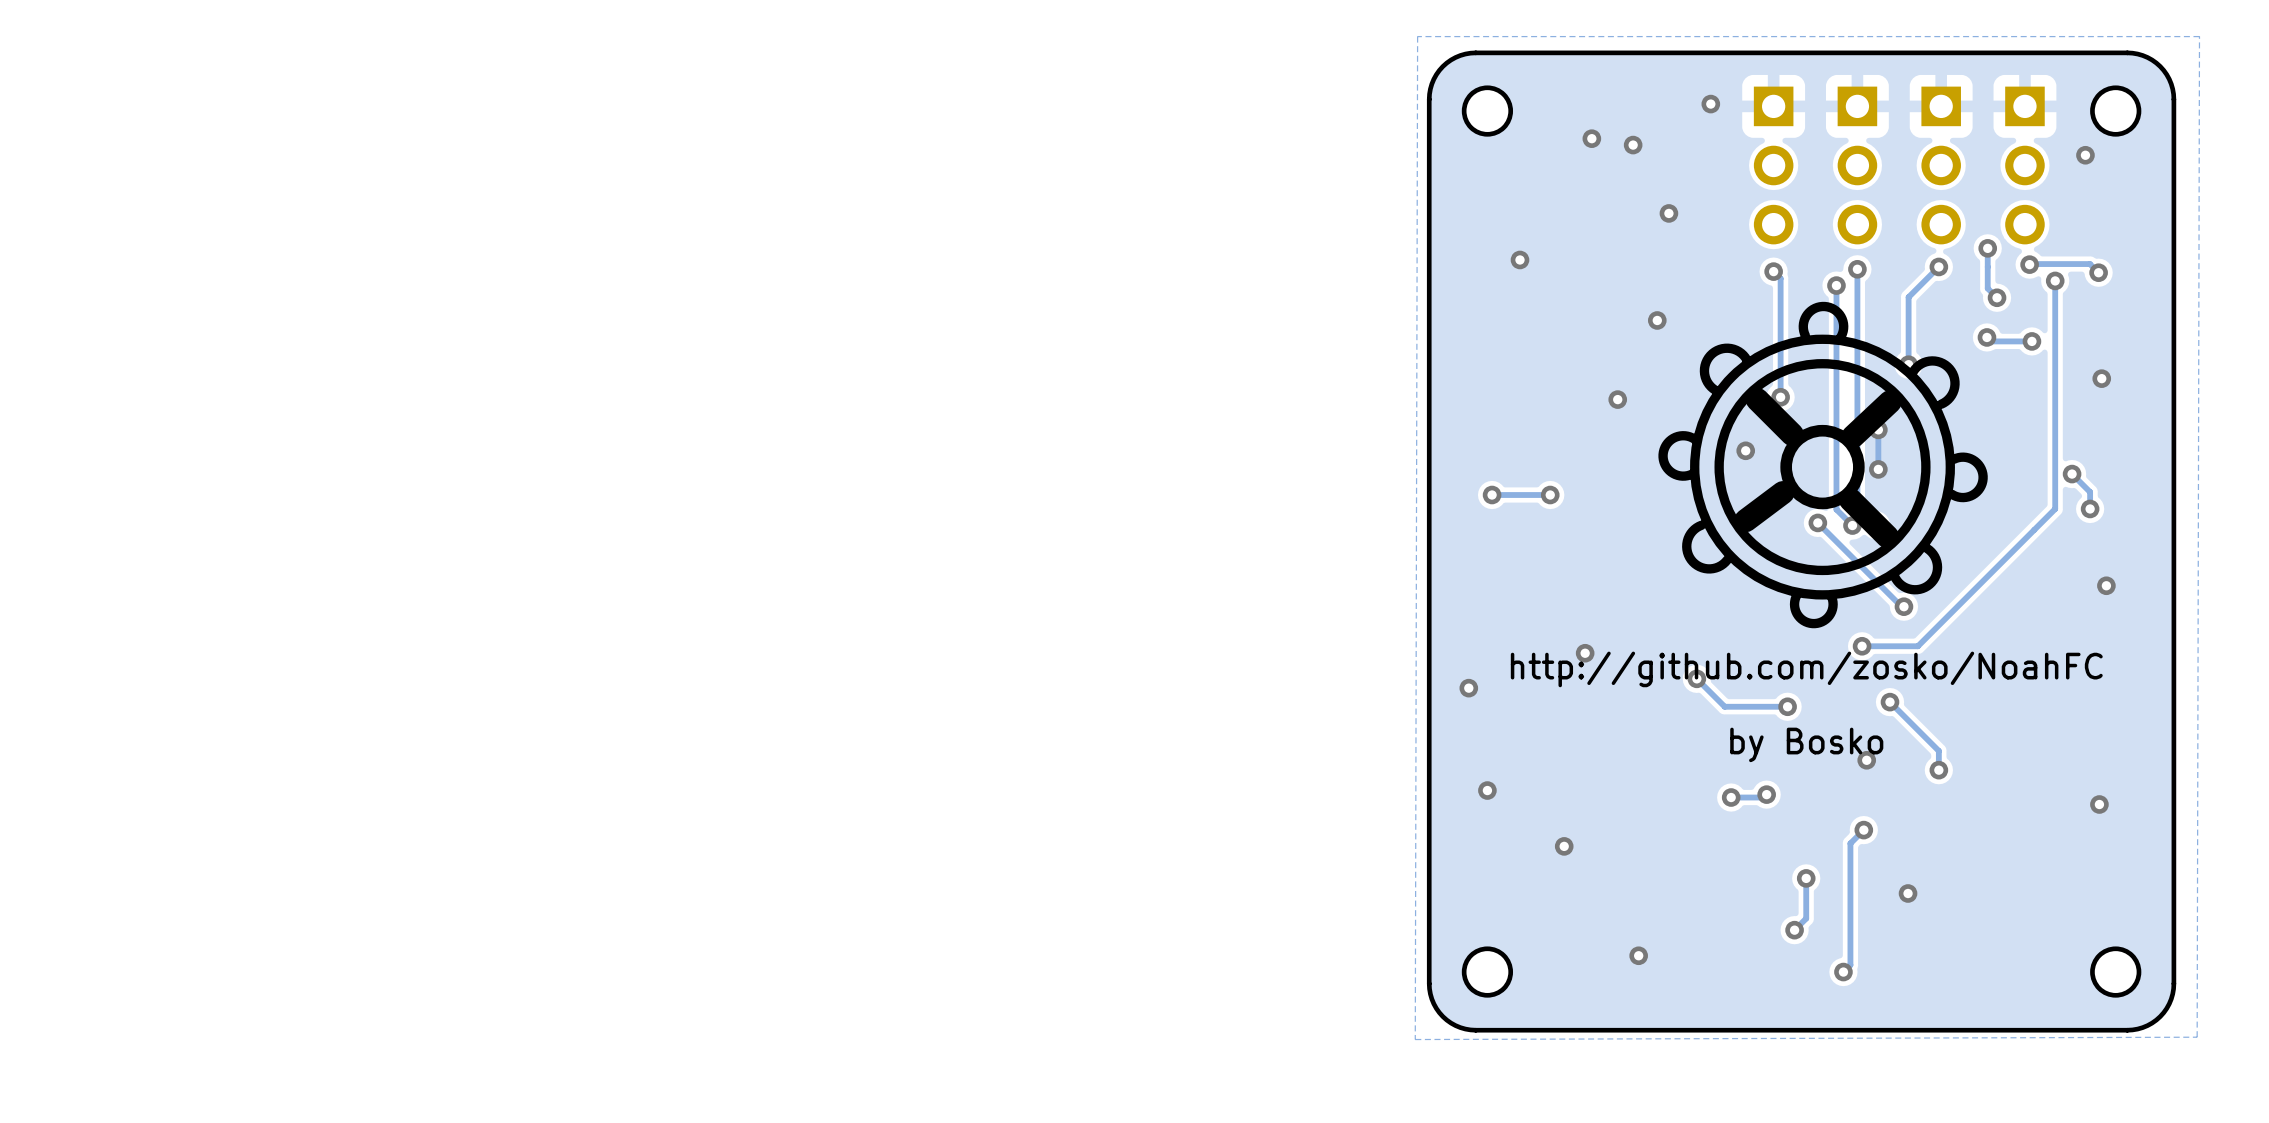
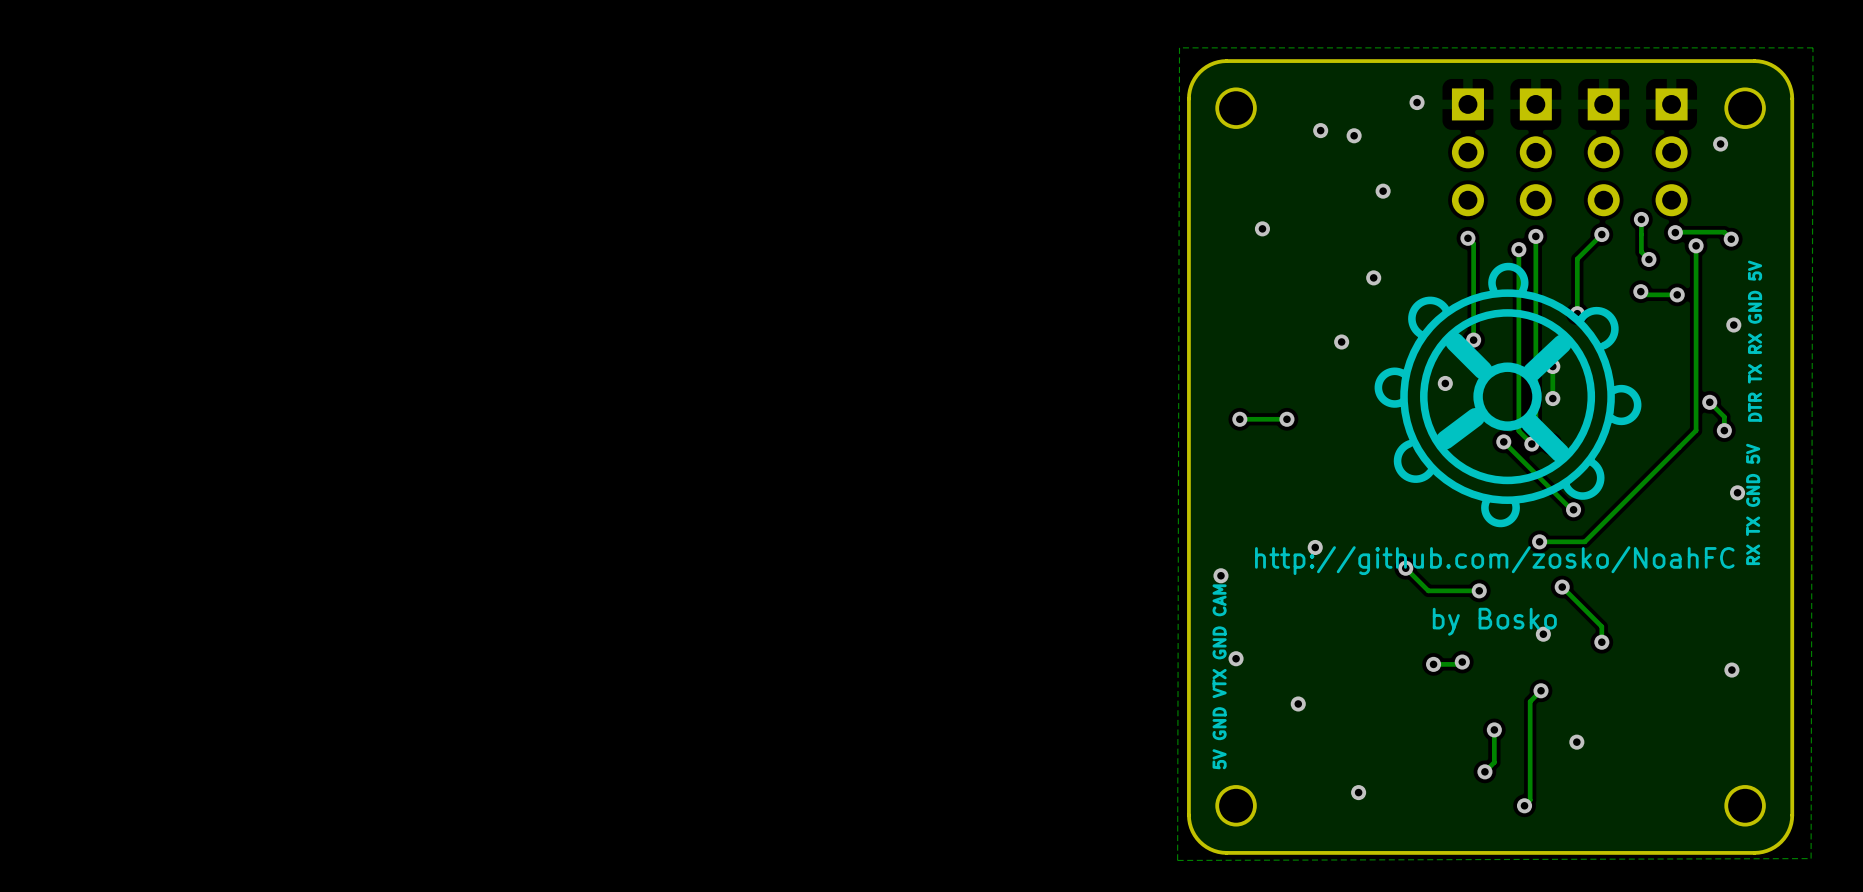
text: none -> DTR TX RX GND 5V (1755, 341)
text: none -> RX TX GND 5V (1753, 504)
text: none -> 5V GND VTX GND CAM (1219, 676)

